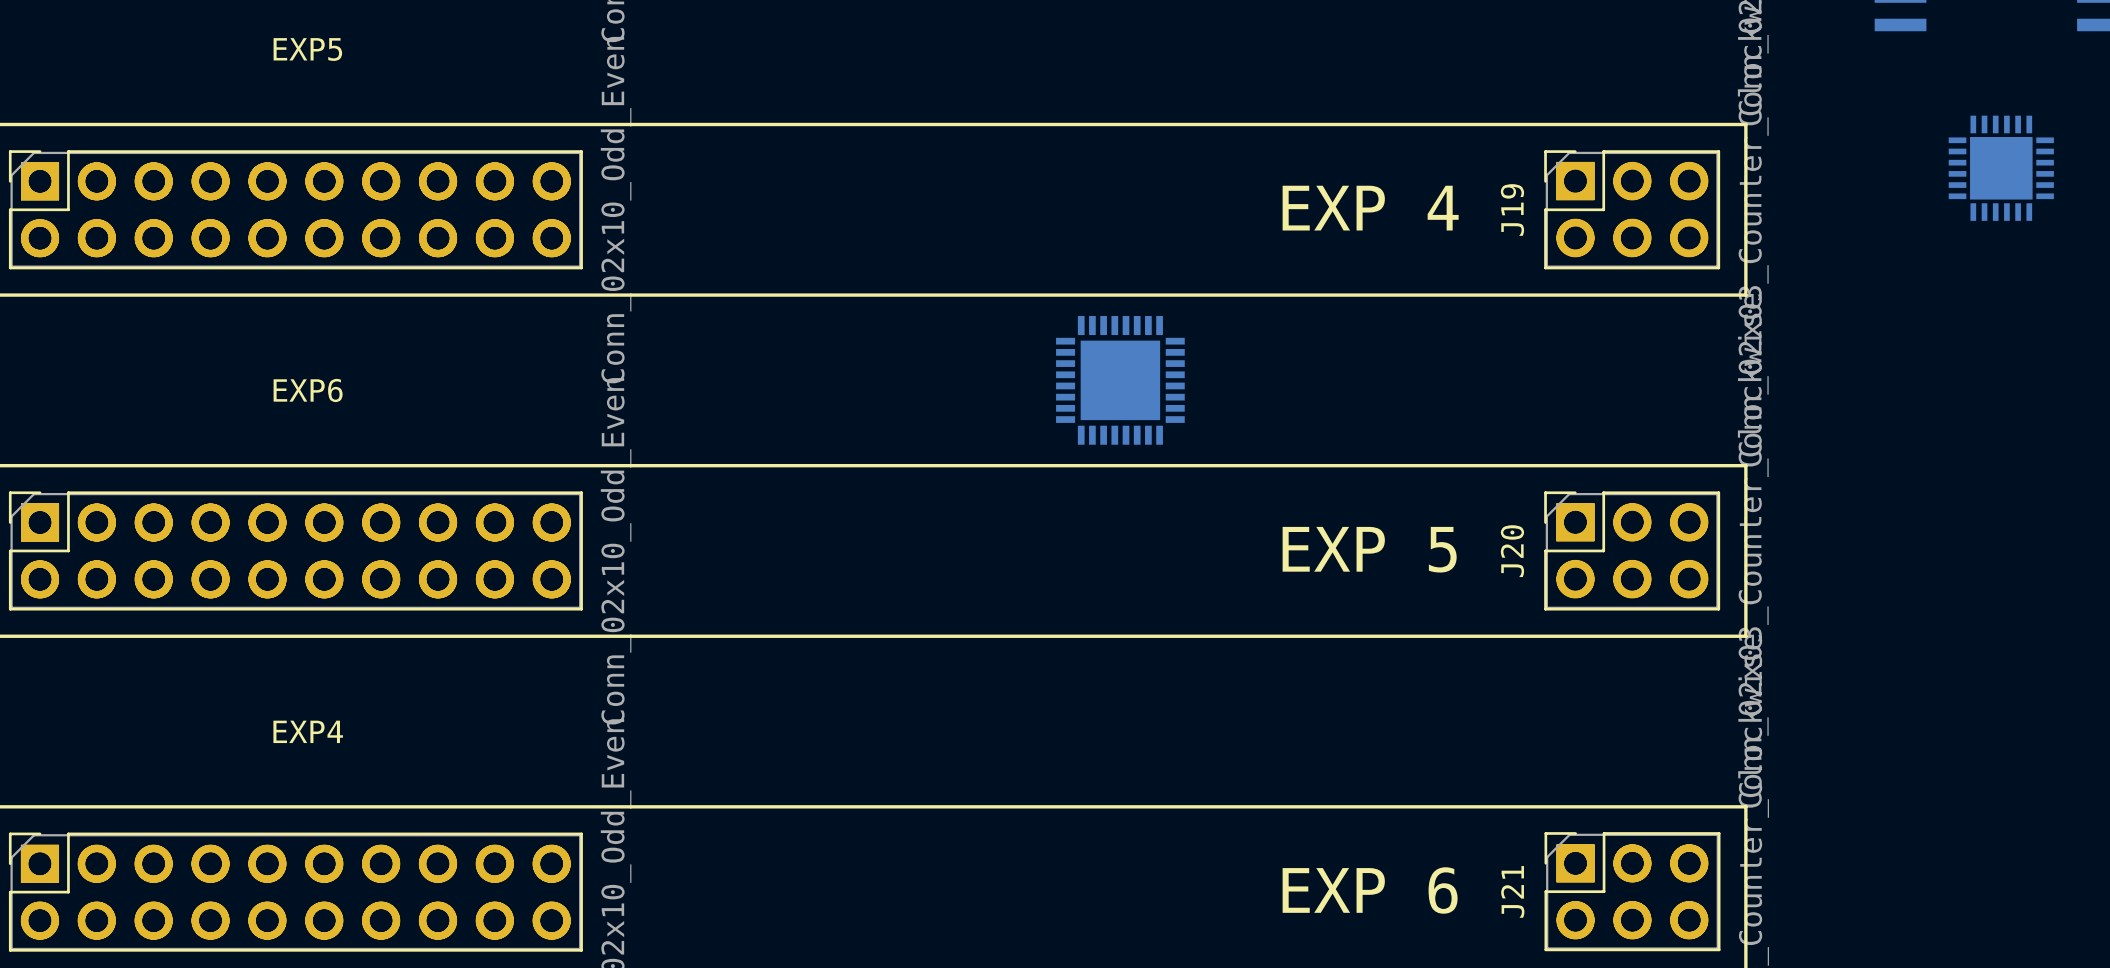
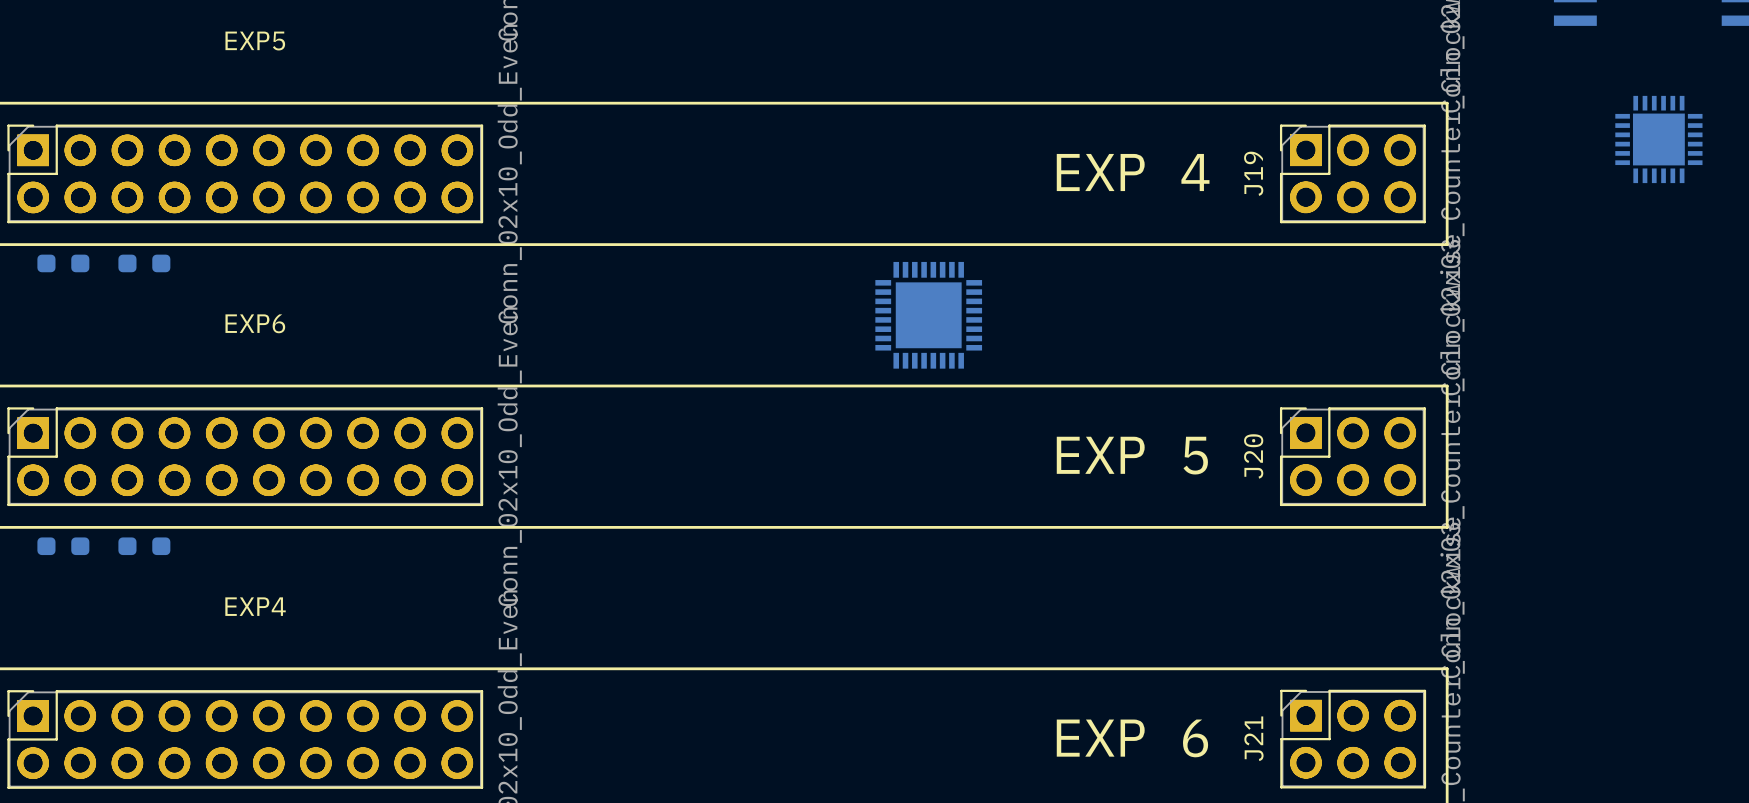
part: none -> (63, 263)
part: none -> (144, 263)
part: none -> (63, 546)
part: none -> (144, 546)

